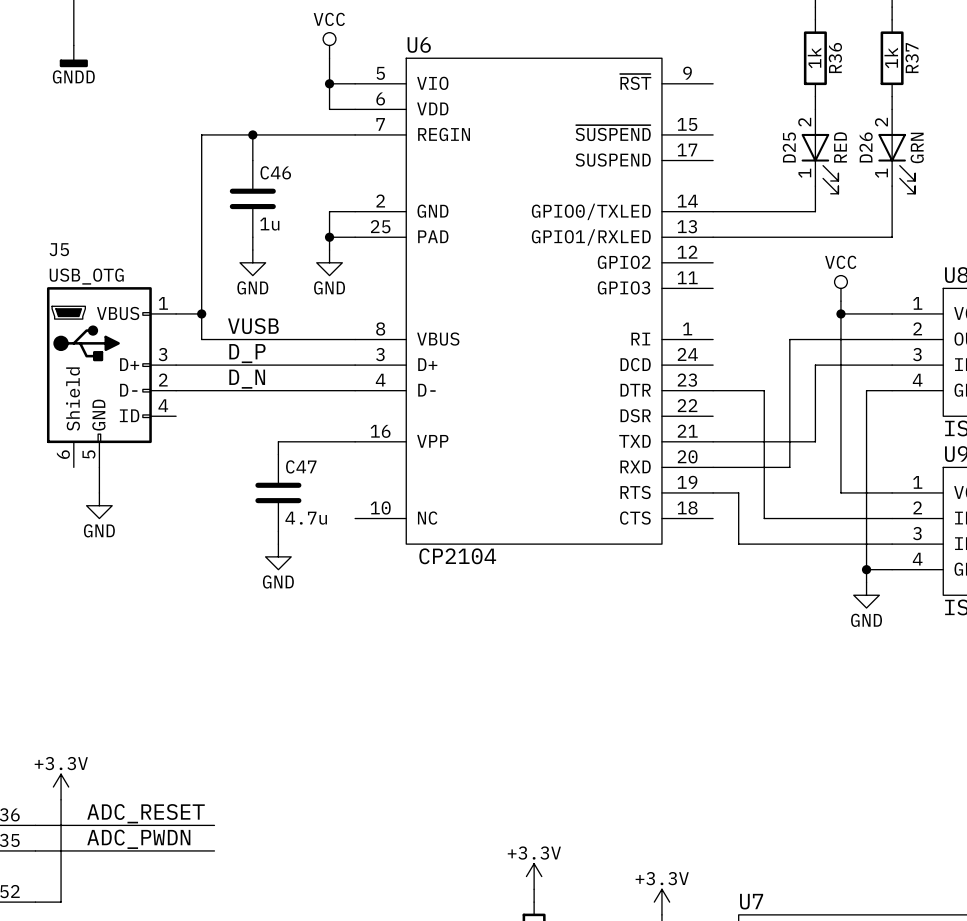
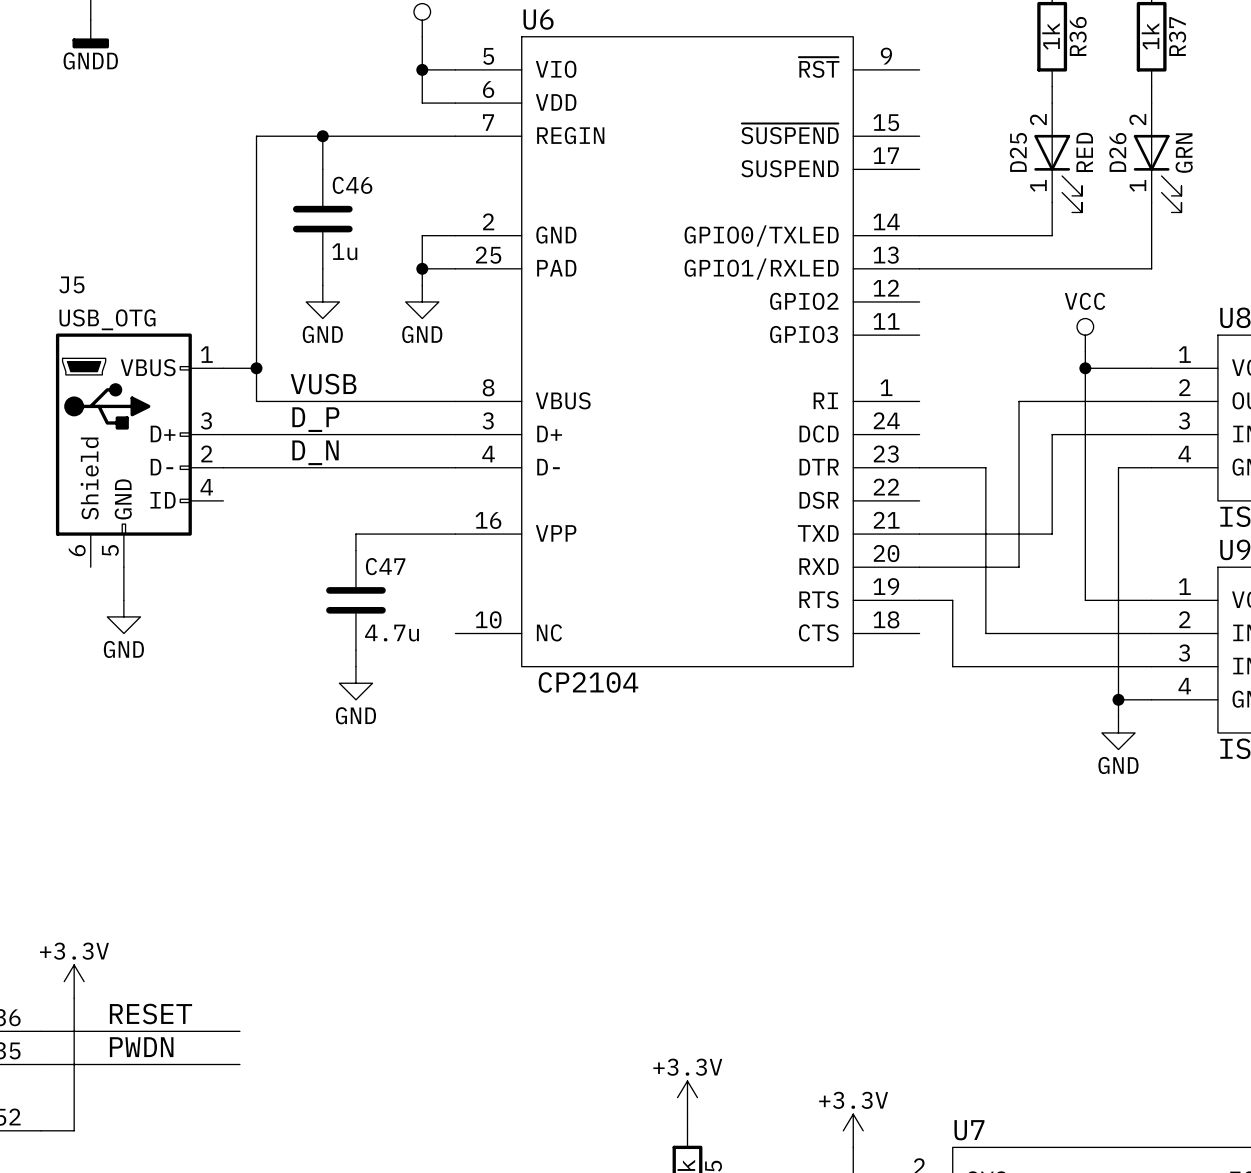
label: ADC_RESET (146, 813) -> RESET (150, 1013)
wire: (188, 825) (214, 825) -> none
label: ADC_PWDN (138, 839) -> PWDN (141, 1047)
wire: (188, 850) (214, 850) -> none

